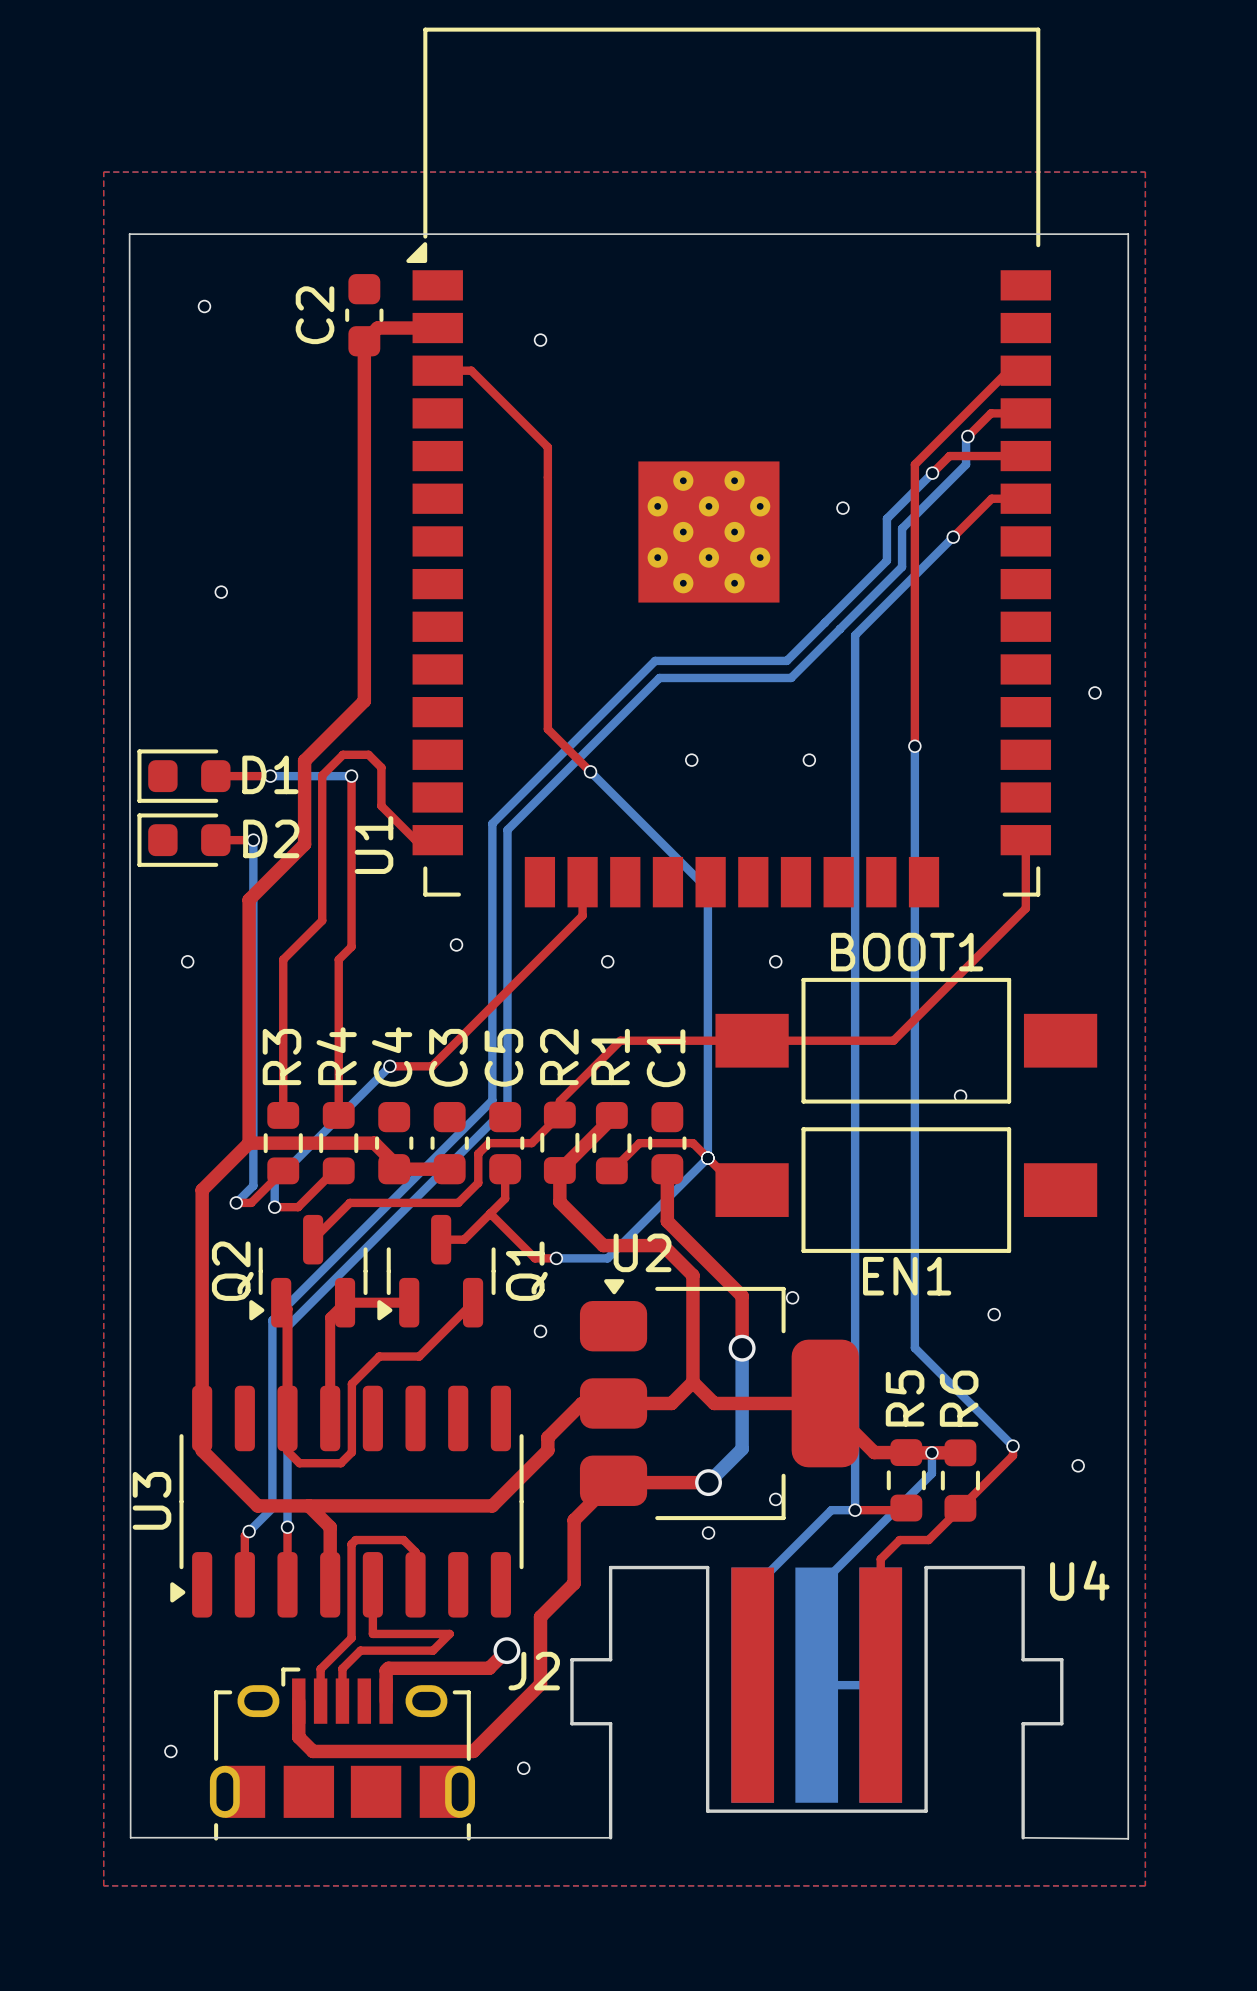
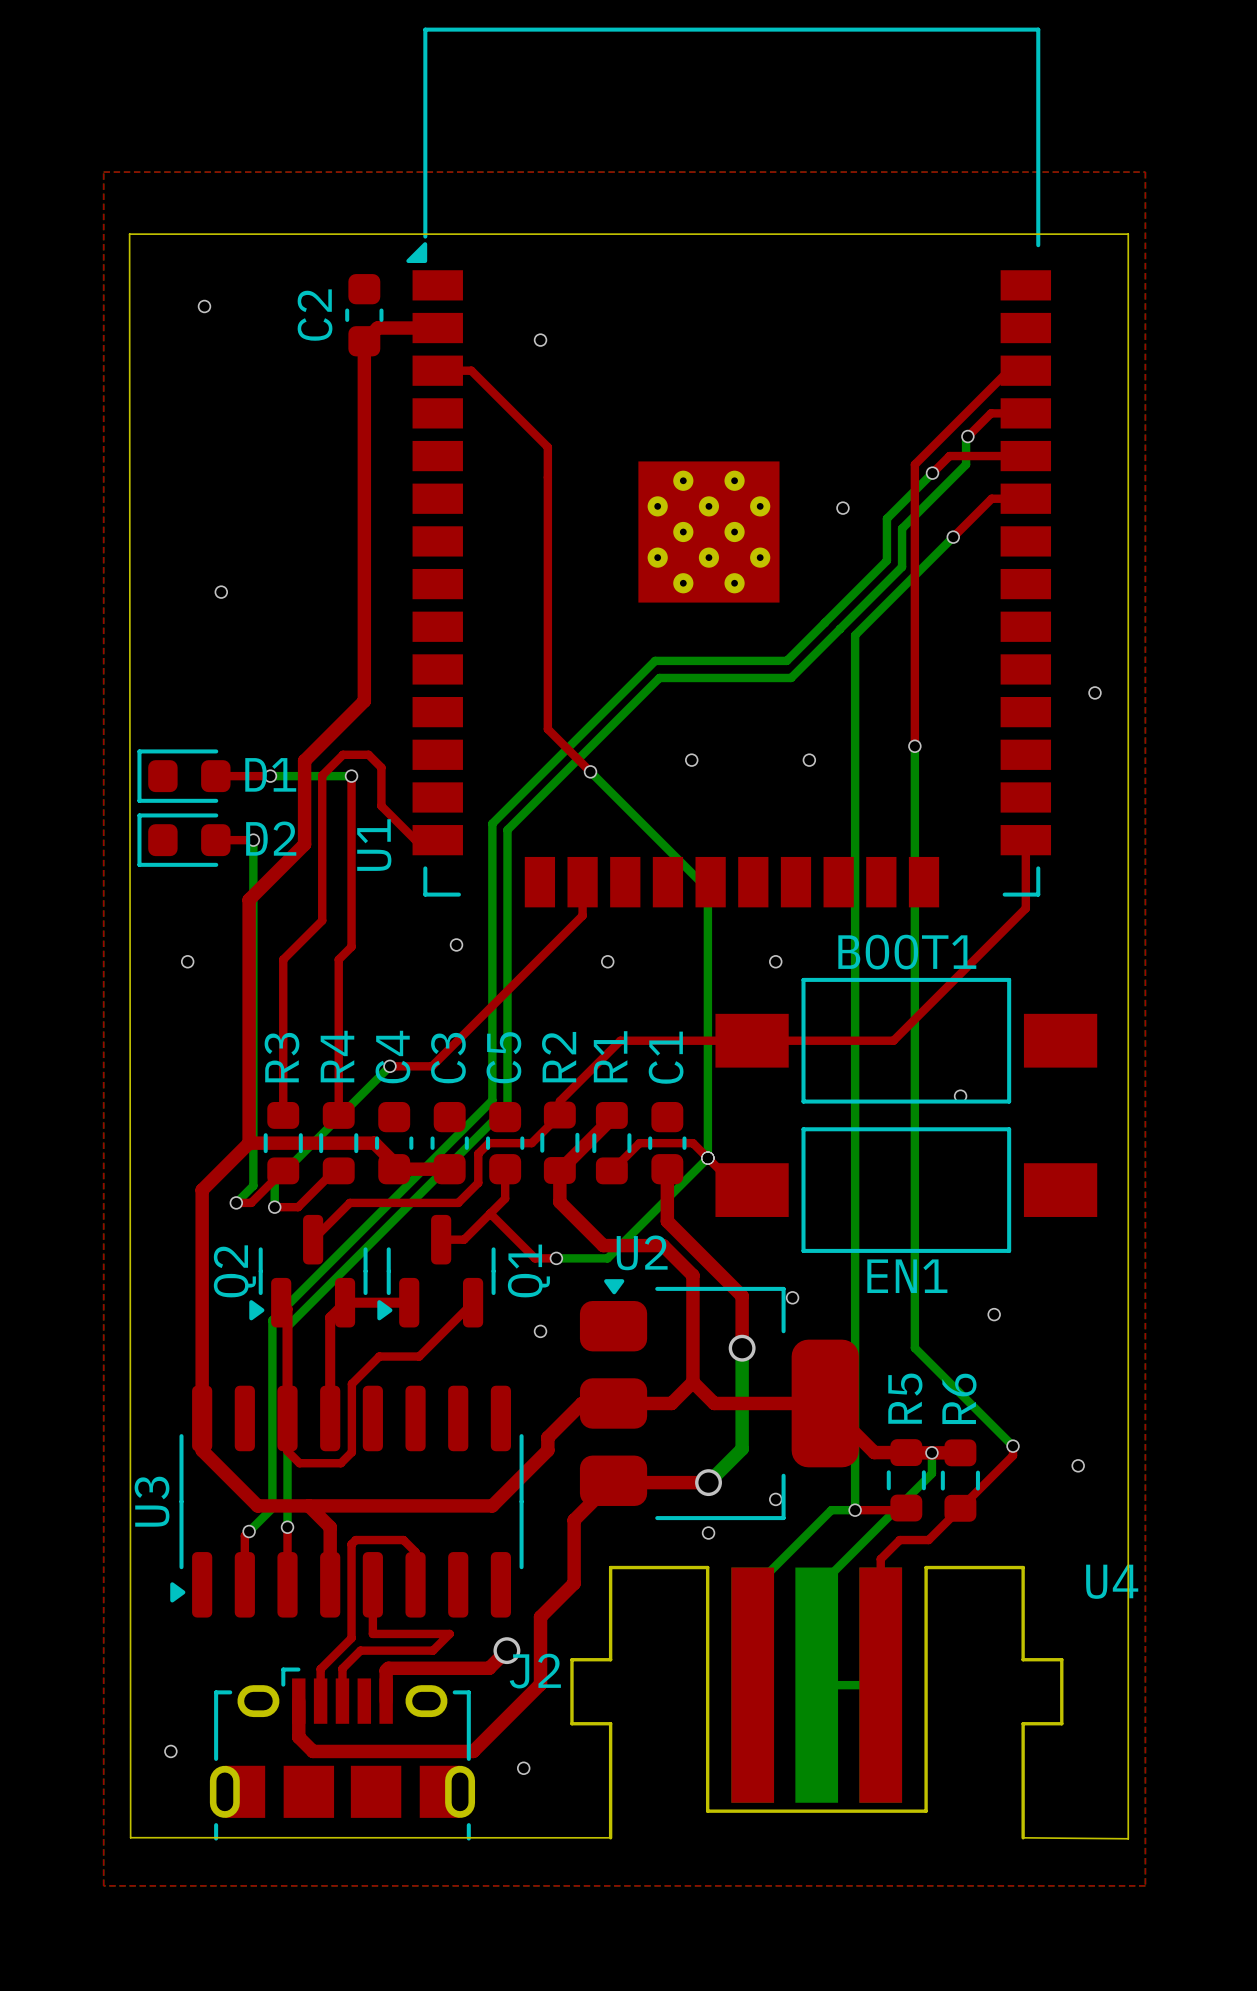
U4 name position: U4 (1079, 1580) -> U4 (1112, 1581)

